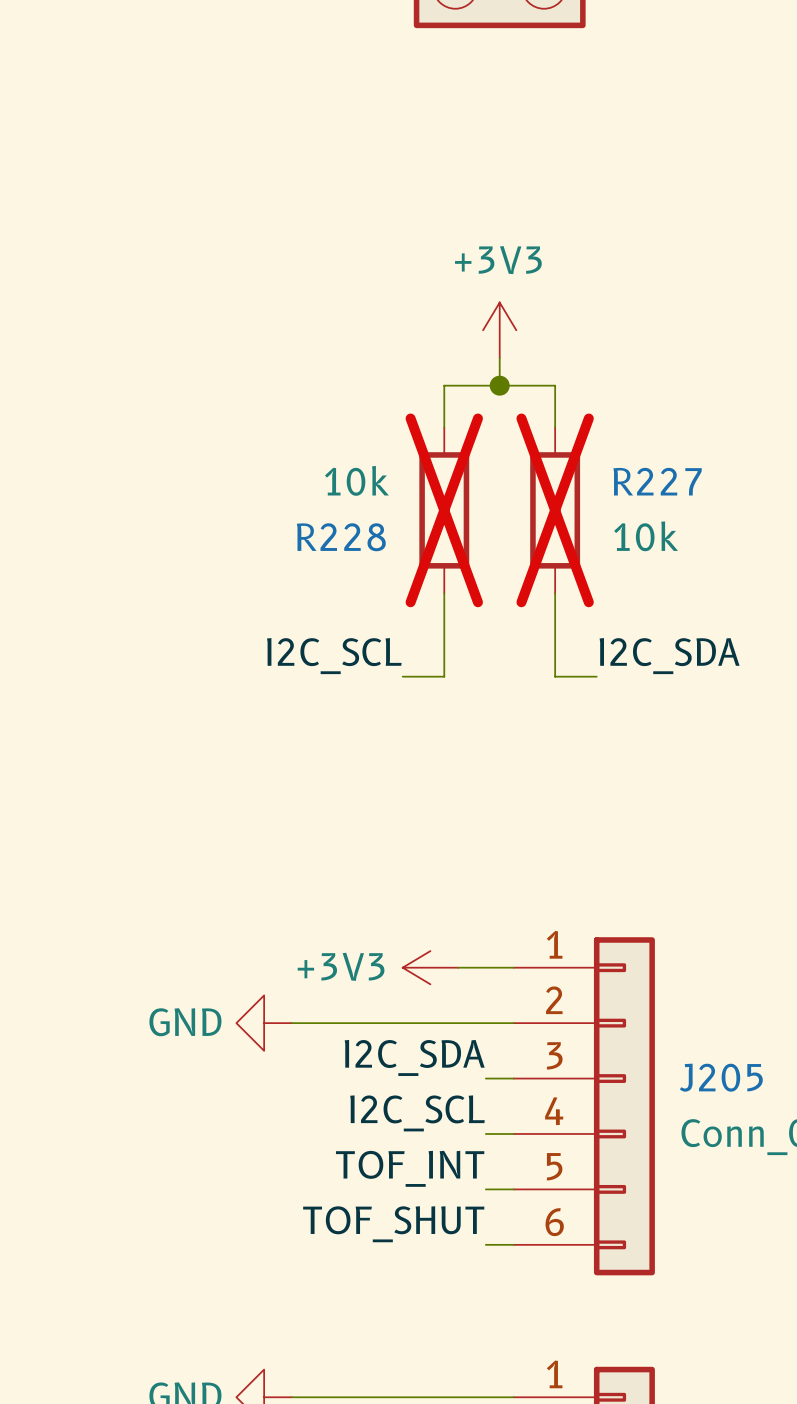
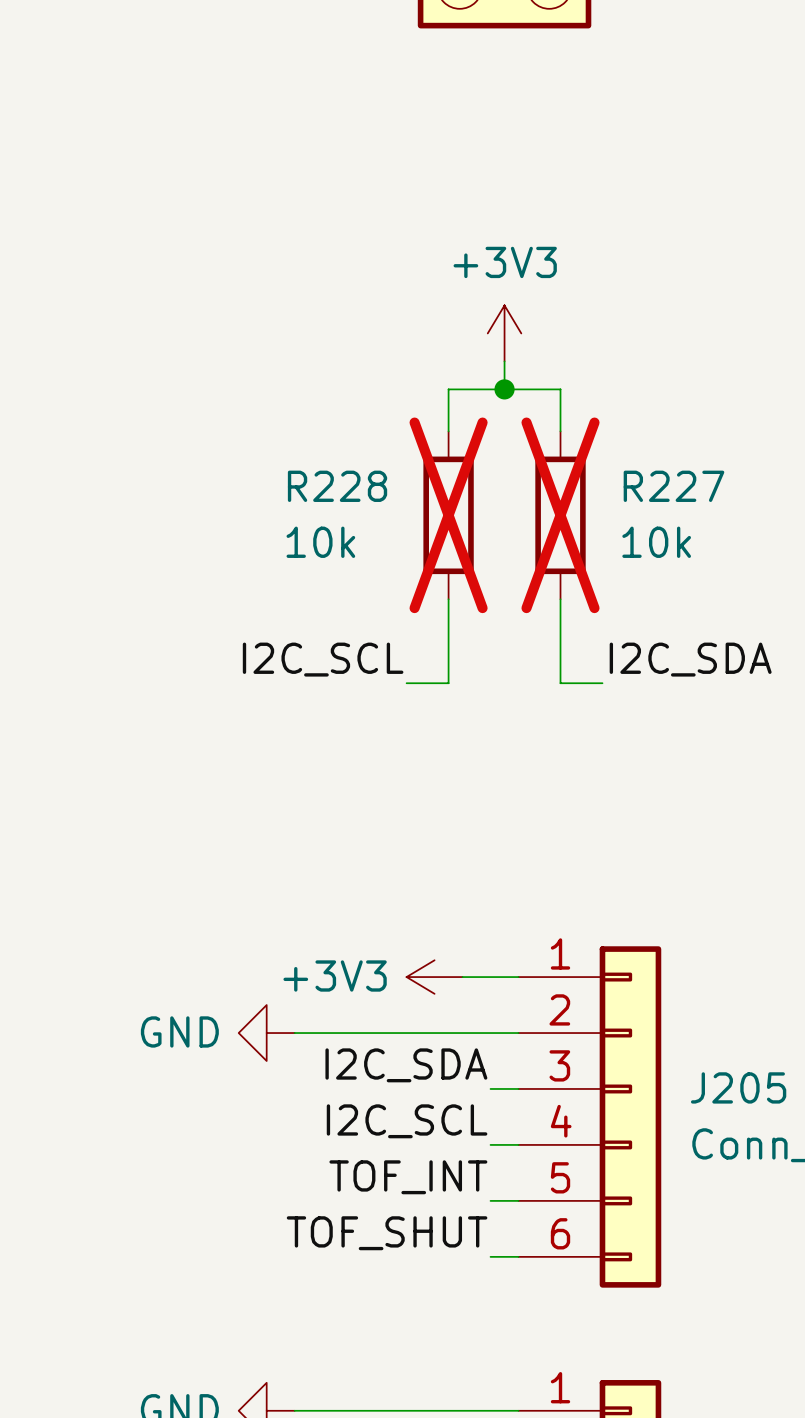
R228 value position: 10k (356, 480) -> 10k (320, 542)
R228 name position: R228 (341, 537) -> R228 (337, 486)

